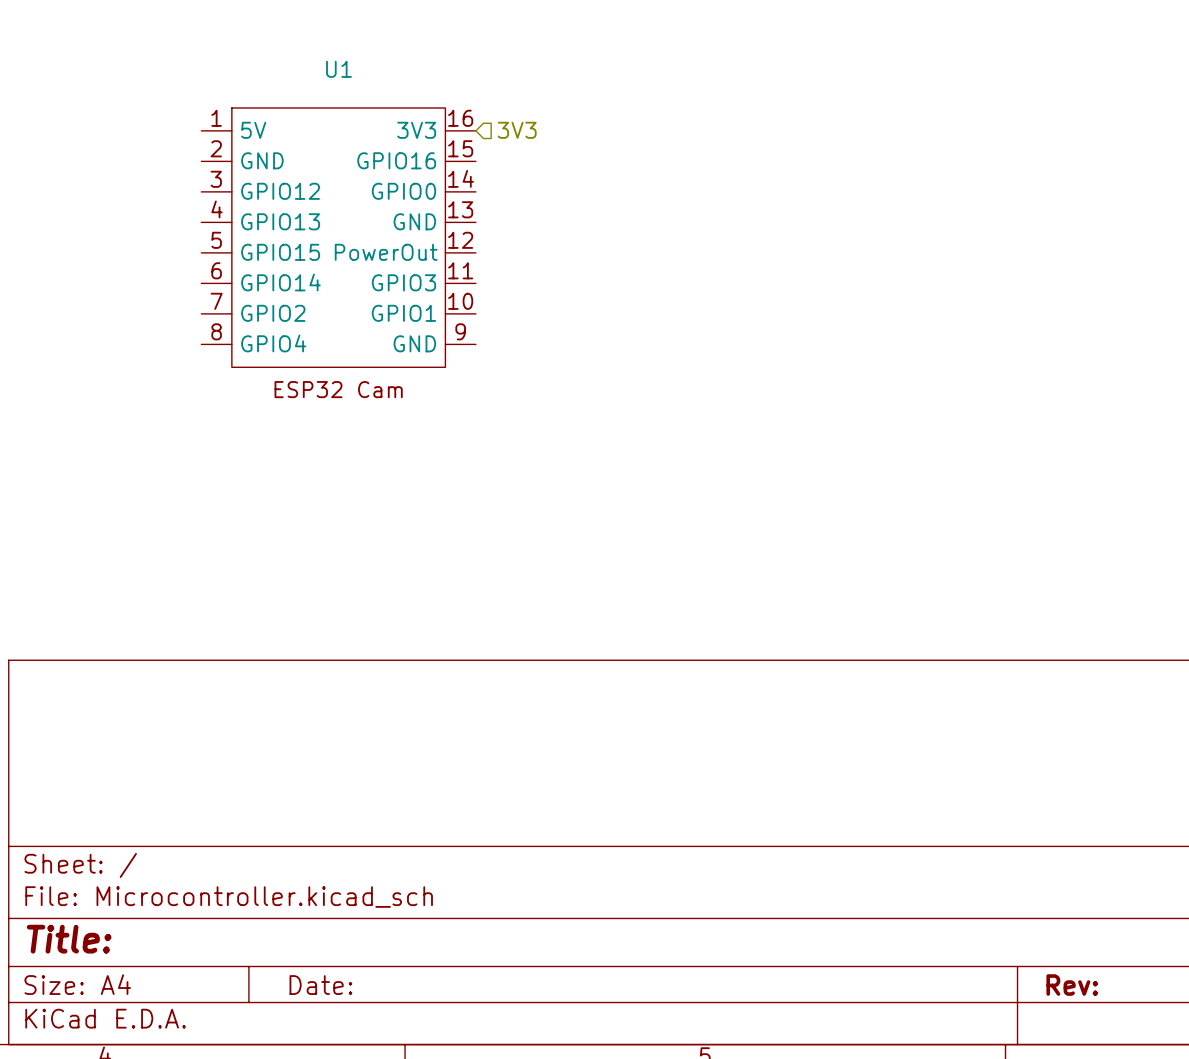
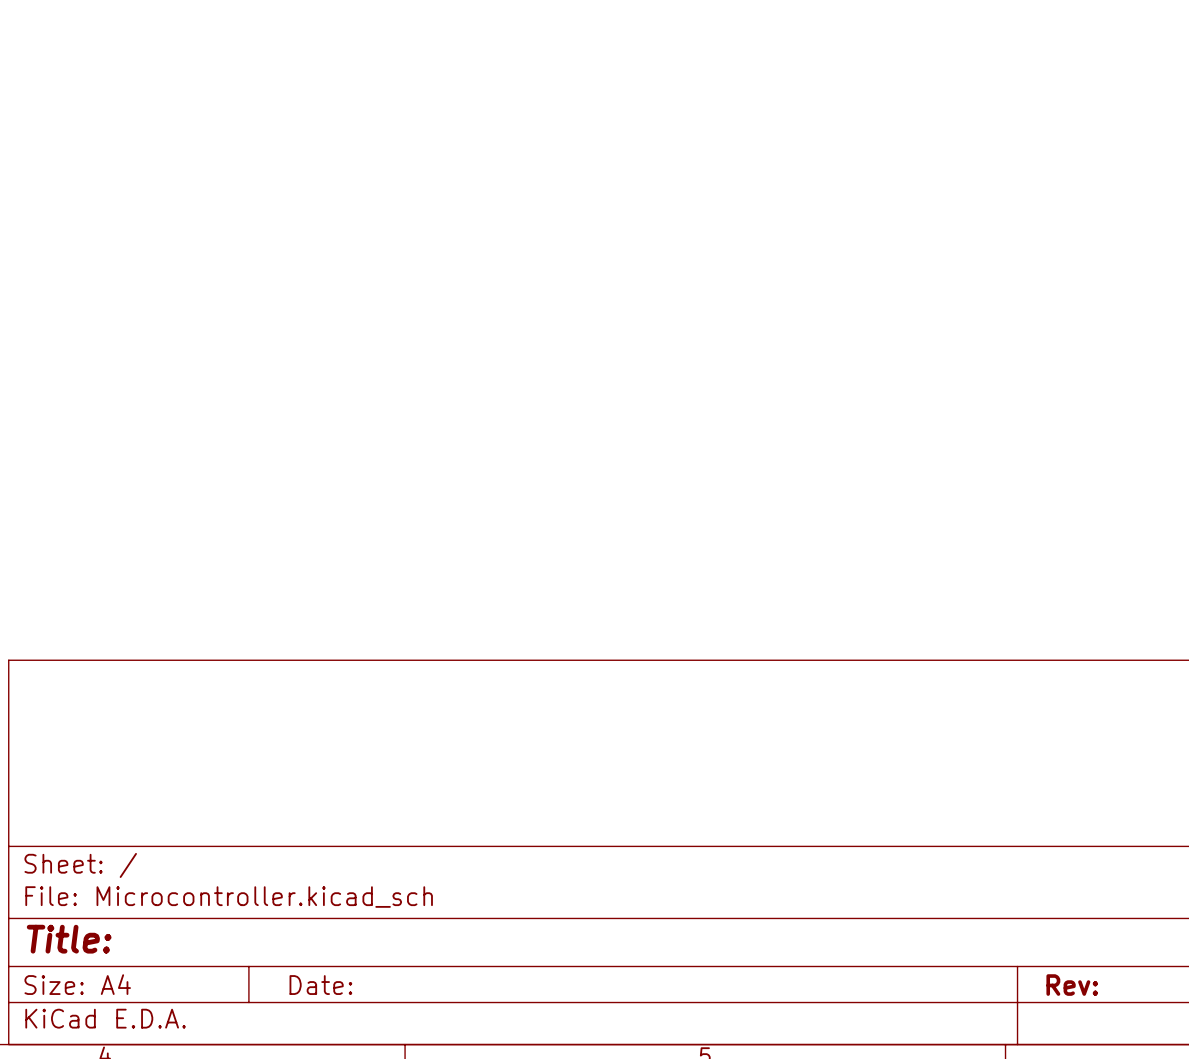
hierarchical label: 3V3 (517, 130) -> none
U1: (338, 237) -> none

